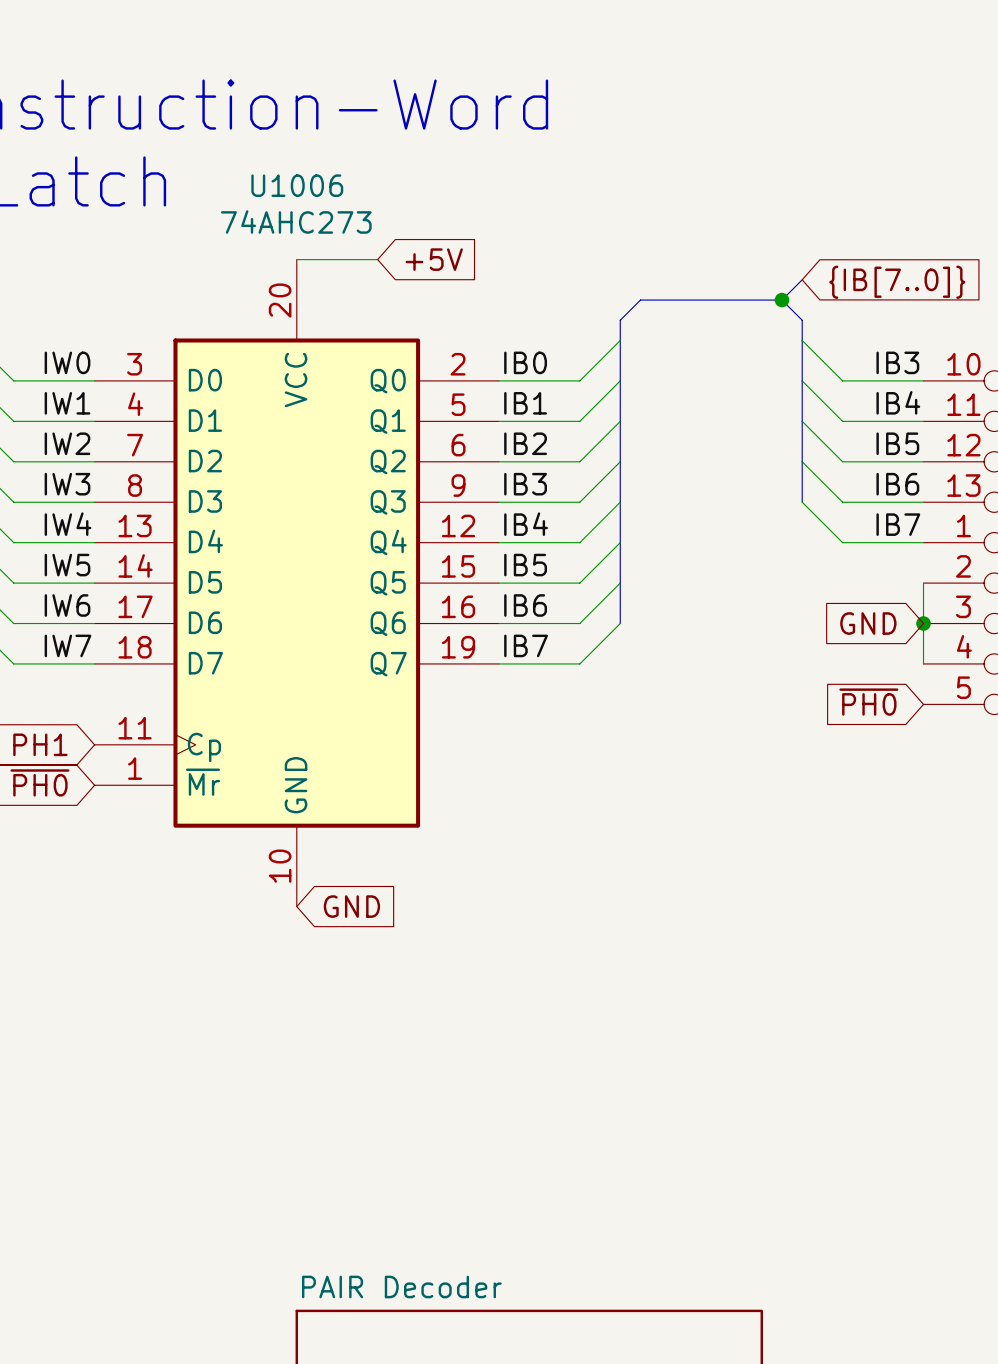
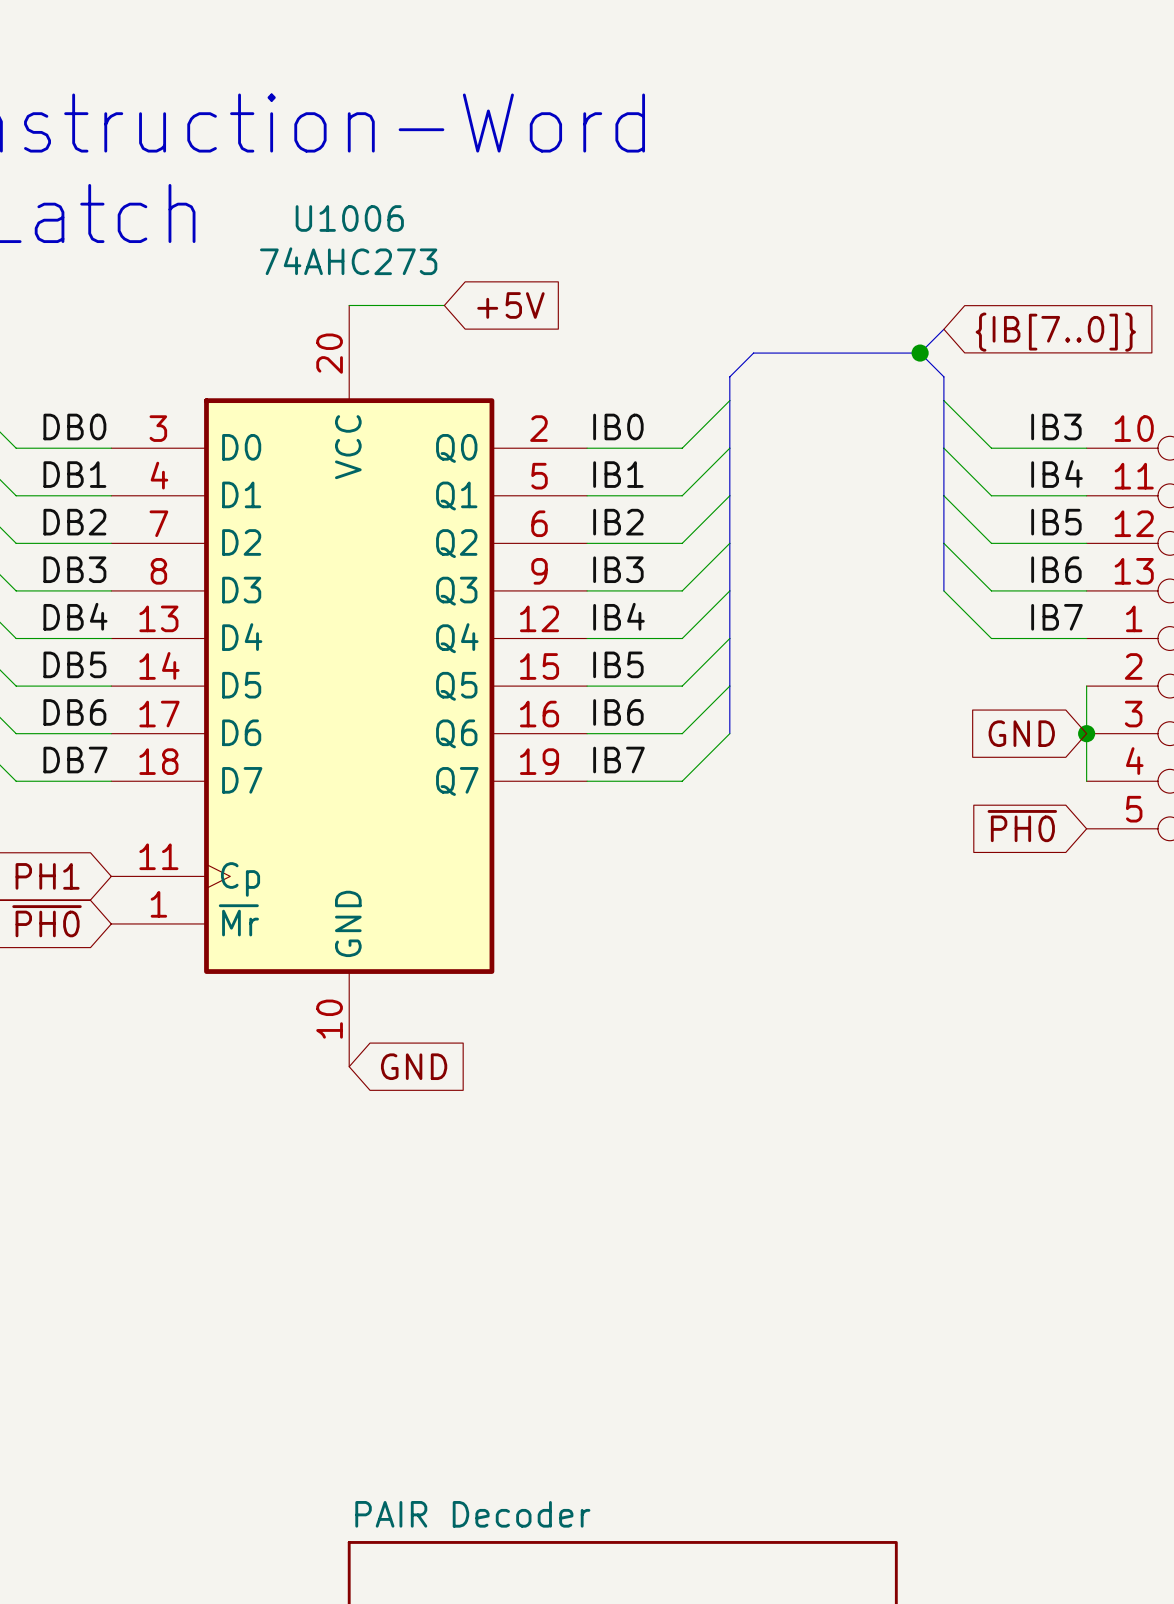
label: IW0 (67, 362) -> DB0 (74, 426)
label: IW1 (67, 403) -> DB1 (74, 474)
label: IW2 (67, 443) -> DB2 (74, 522)
label: IW3 (67, 484) -> DB3 (74, 569)
label: IW4 (67, 524) -> DB4 (75, 616)
label: IW5 (67, 565) -> DB5 (74, 664)
label: IW6 (67, 605) -> DB6 (74, 712)
label: IW7 (67, 645) -> DB7 (75, 760)

